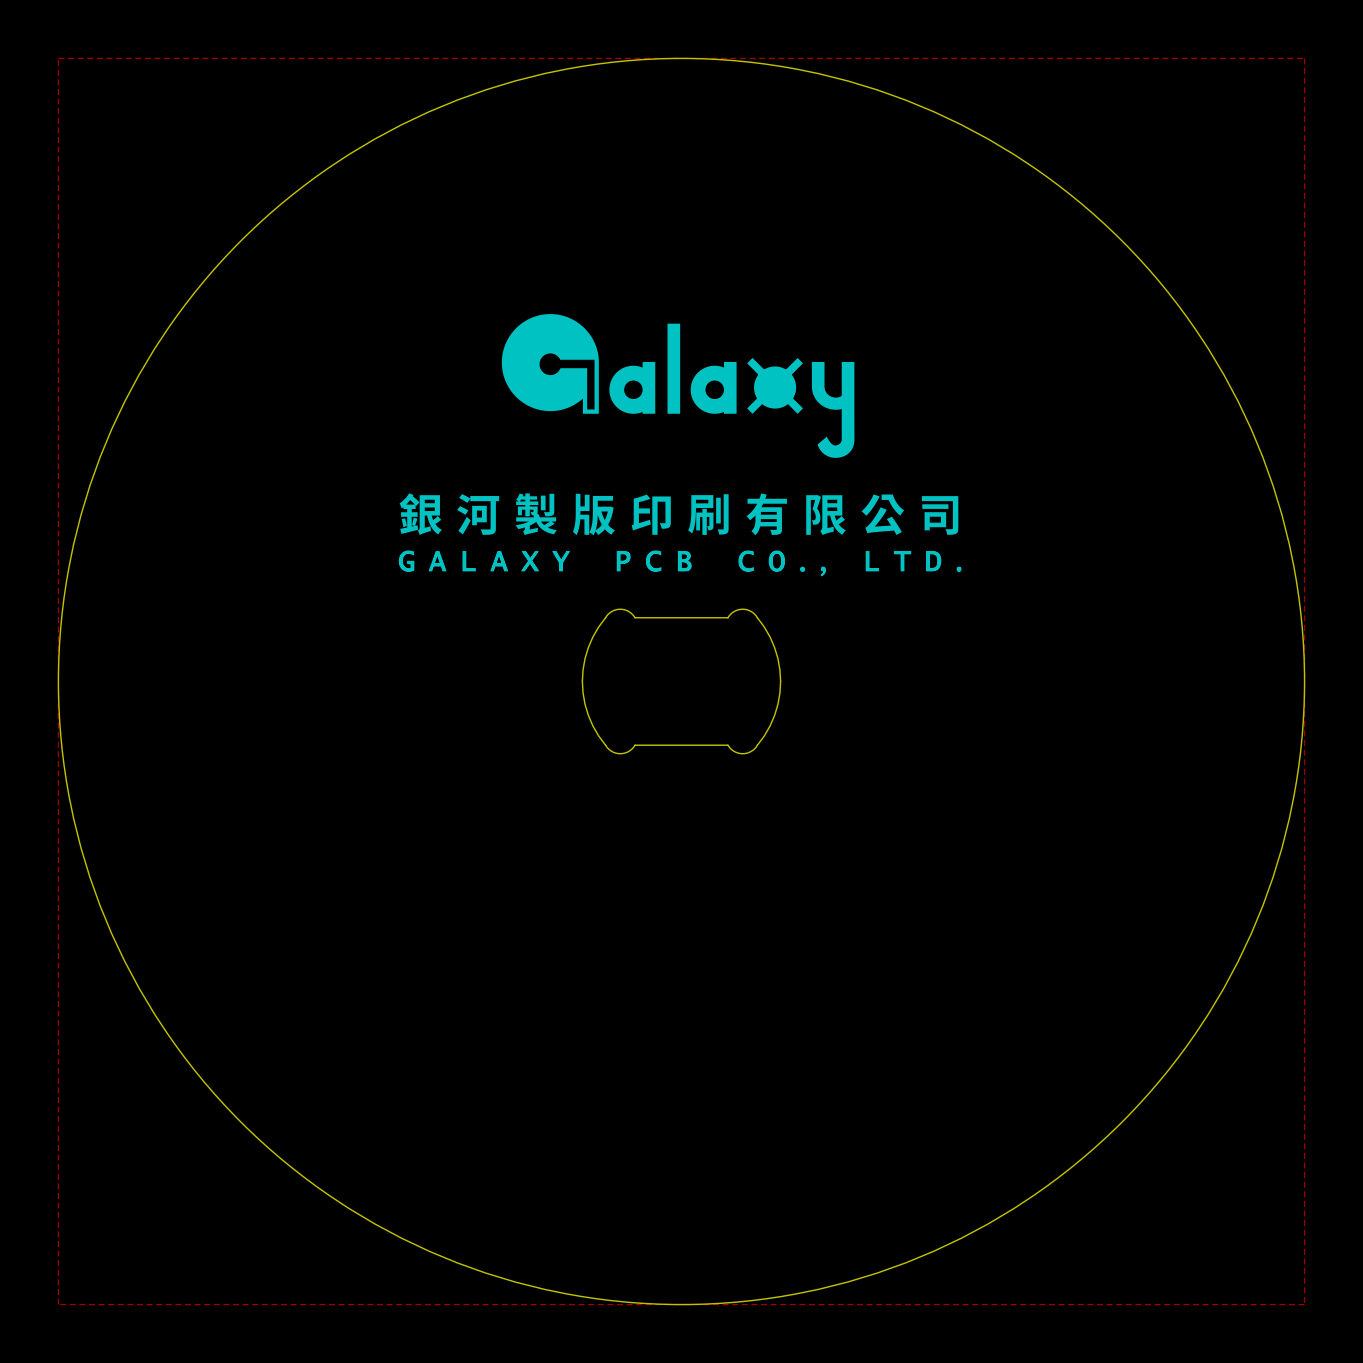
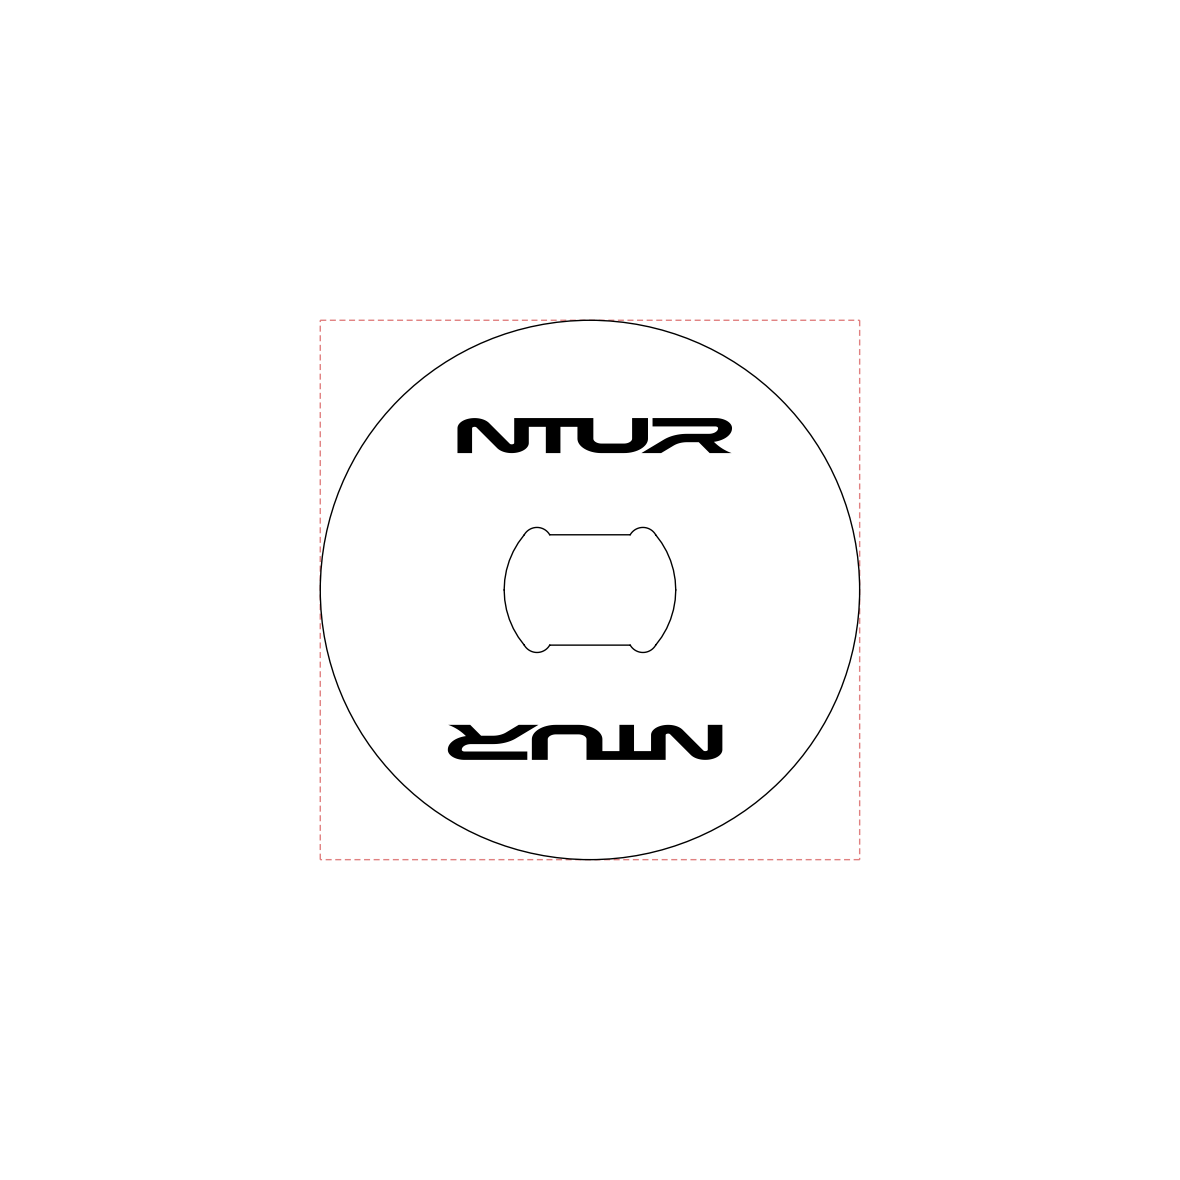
round board edge size: [57, 57, 1306, 1306] -> [319, 319, 861, 861]
zone outline: (58, 58) (1304, 58) (1304, 1304) (58, 1304) (58, 58) -> none
drawing: [501, 314, 855, 458] -> none
zone outline: none -> (320, 320) (859, 320) (859, 859) (320, 859) (320, 320)
drawing: none -> [457, 418, 529, 454]
drawing: none -> [577, 418, 733, 454]
drawing: [398, 493, 962, 577] -> none
drawing shape: [631, 494, 651, 531] -> [528, 418, 578, 454]
drawing: none -> [447, 724, 723, 760]

